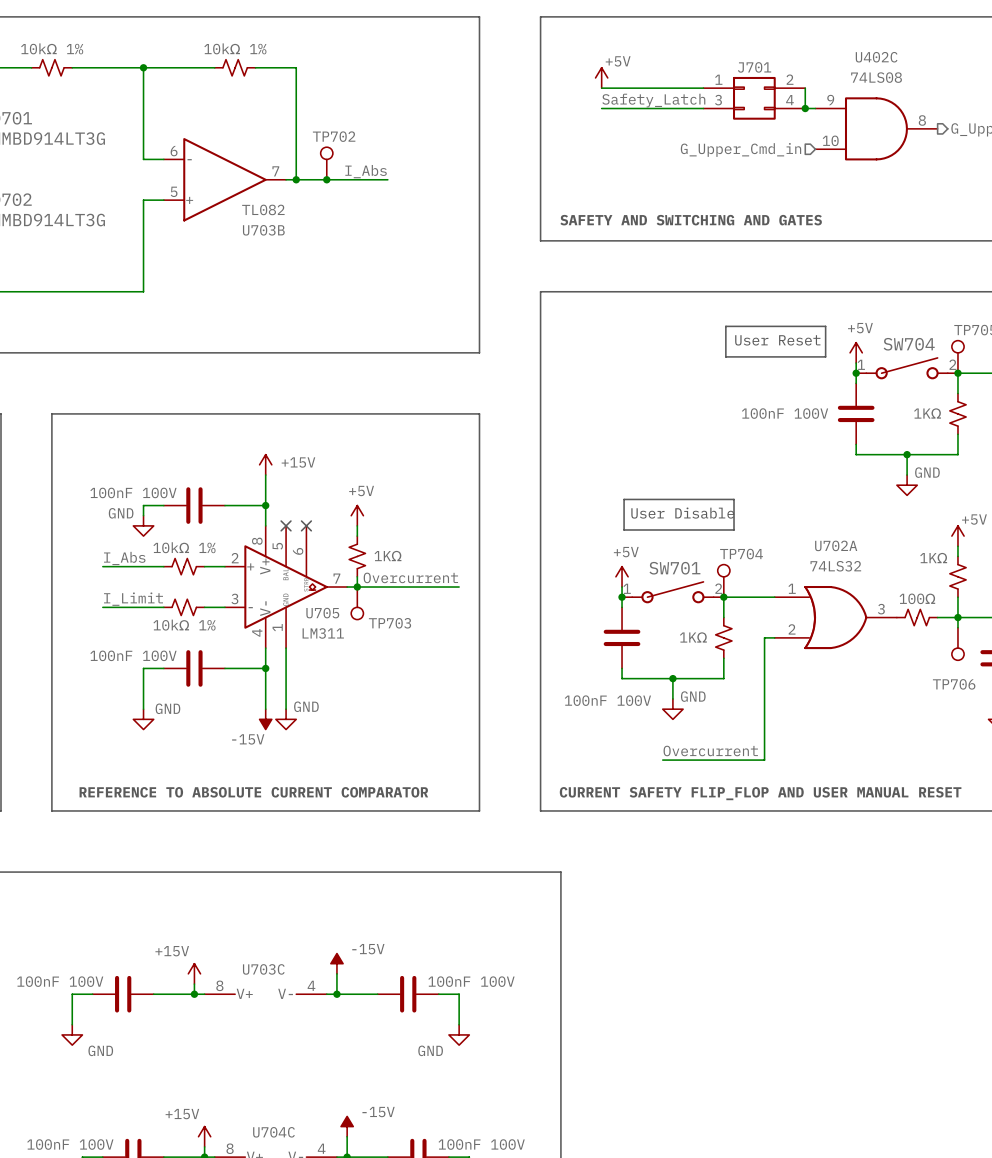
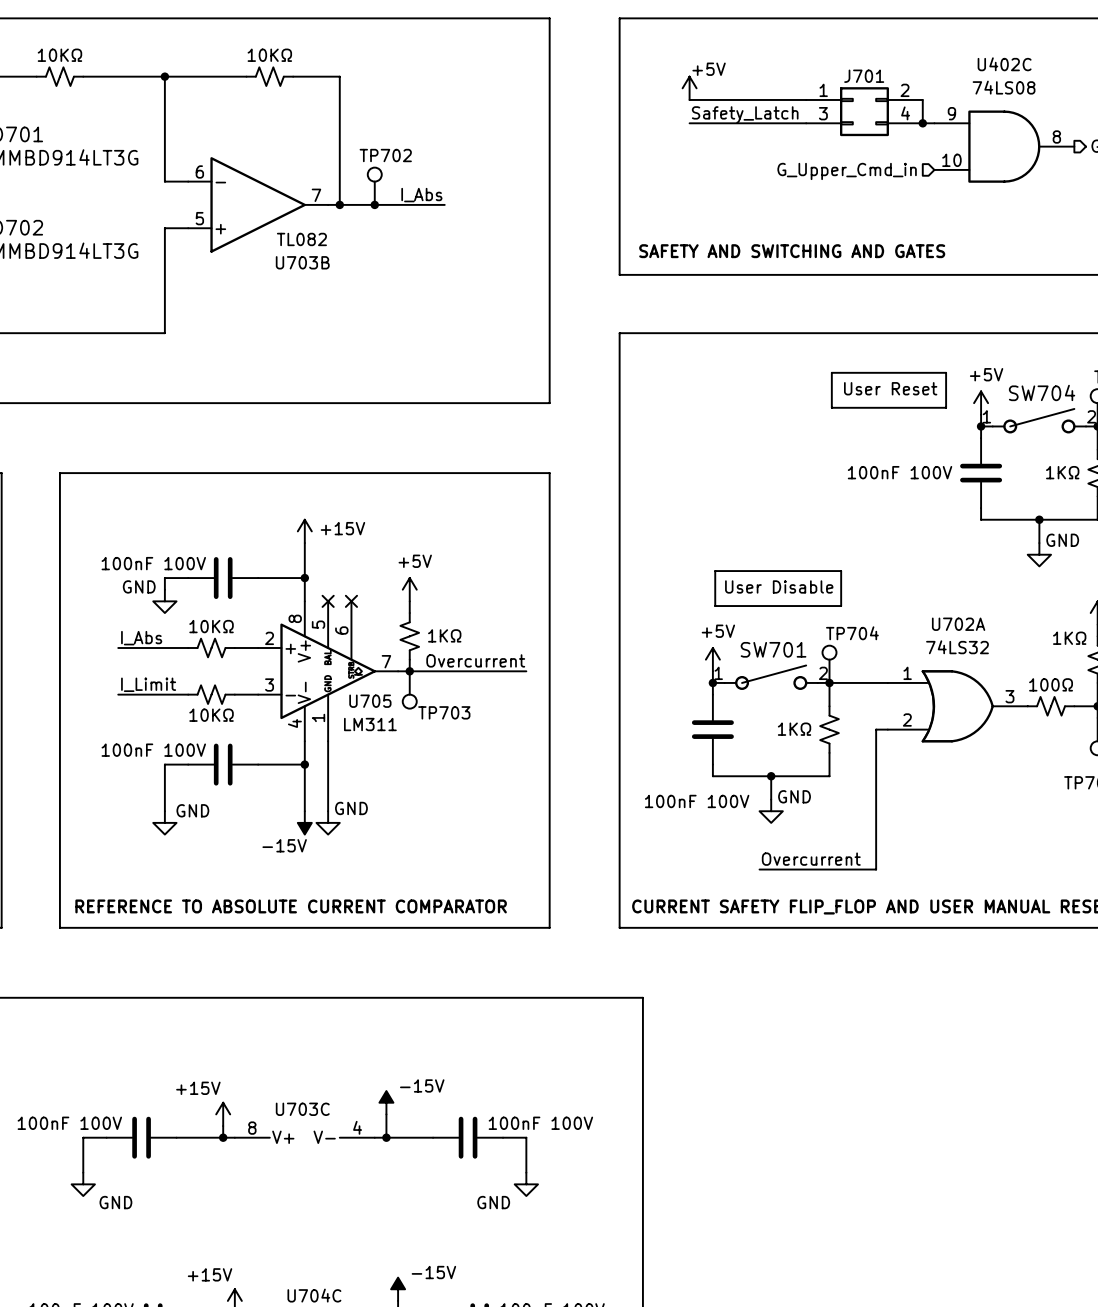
part value: 10kΩ 1% (52, 48) -> 10KΩ (59, 55)
part value: 10kΩ 1% (235, 48) -> 10KΩ (269, 55)
part value: 10kΩ 1% (184, 547) -> 10KΩ (211, 626)
part value: 10kΩ 1% (184, 625) -> 10KΩ (211, 715)

